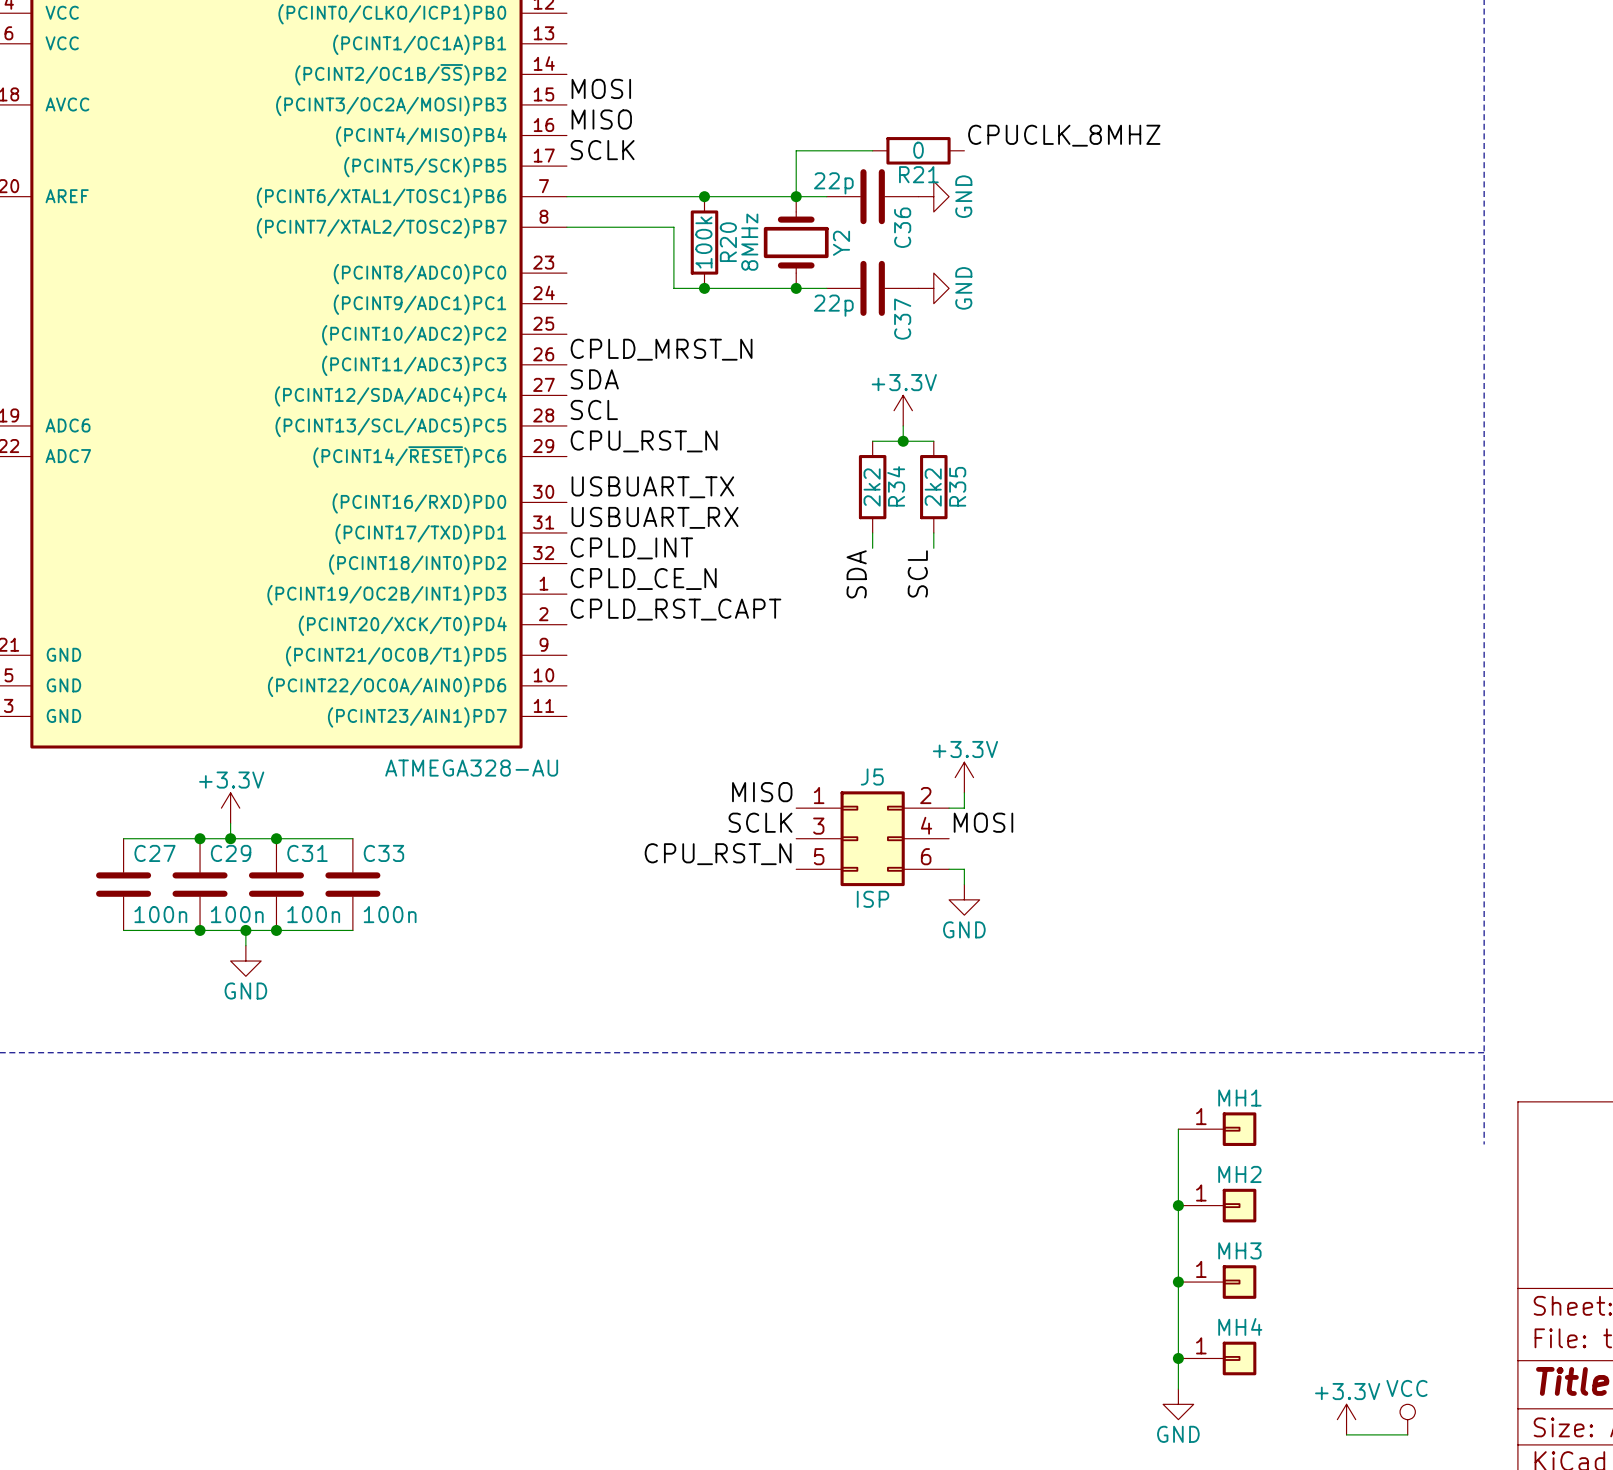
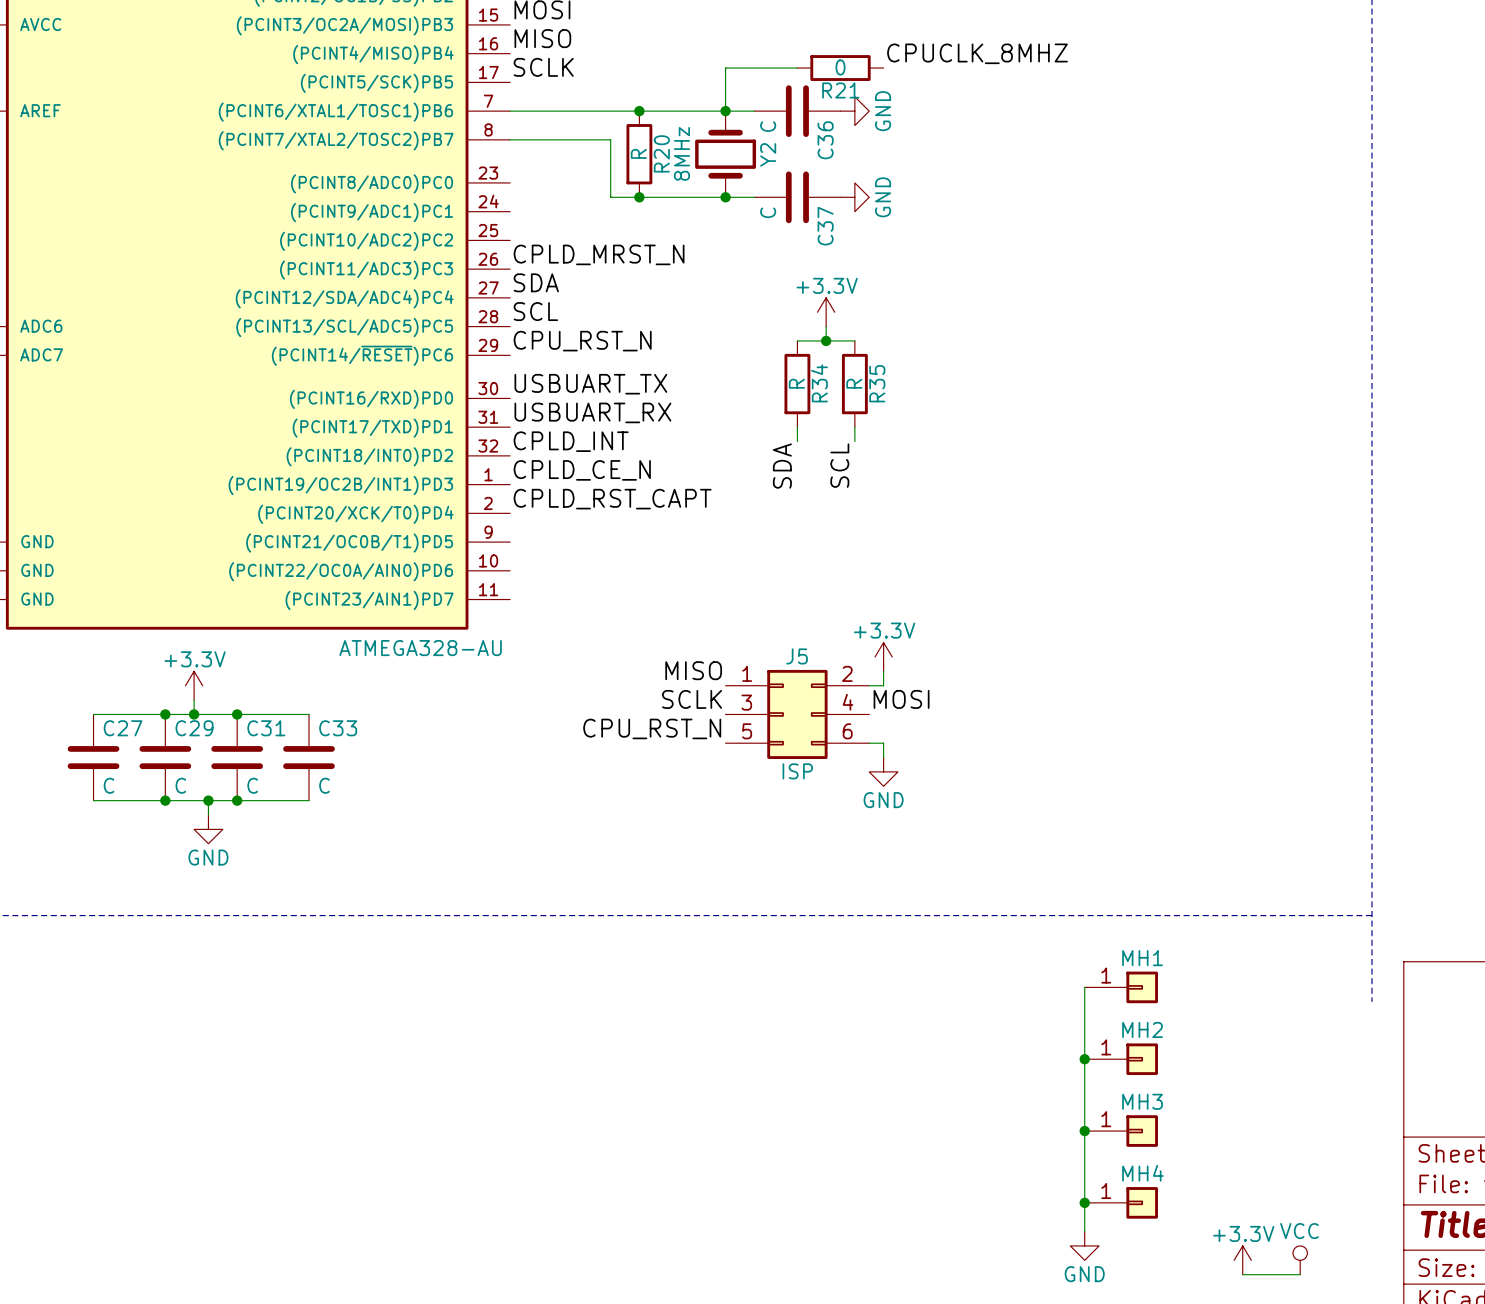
C36 value: 22p (833, 183) -> C (768, 126)
R20 value: 100k (703, 242) -> R (638, 153)
C37 value: 22p (833, 305) -> C (768, 212)
R34 value: 2k2 (872, 487) -> R (796, 383)
R35 value: 2k2 (933, 487) -> R (854, 383)
C27 value: 100n (160, 914) -> C (109, 785)
C29 value: 100n (237, 914) -> C (180, 785)
C31 value: 100n (313, 914) -> C (252, 785)
C33 value: 100n (390, 914) -> C (324, 785)

